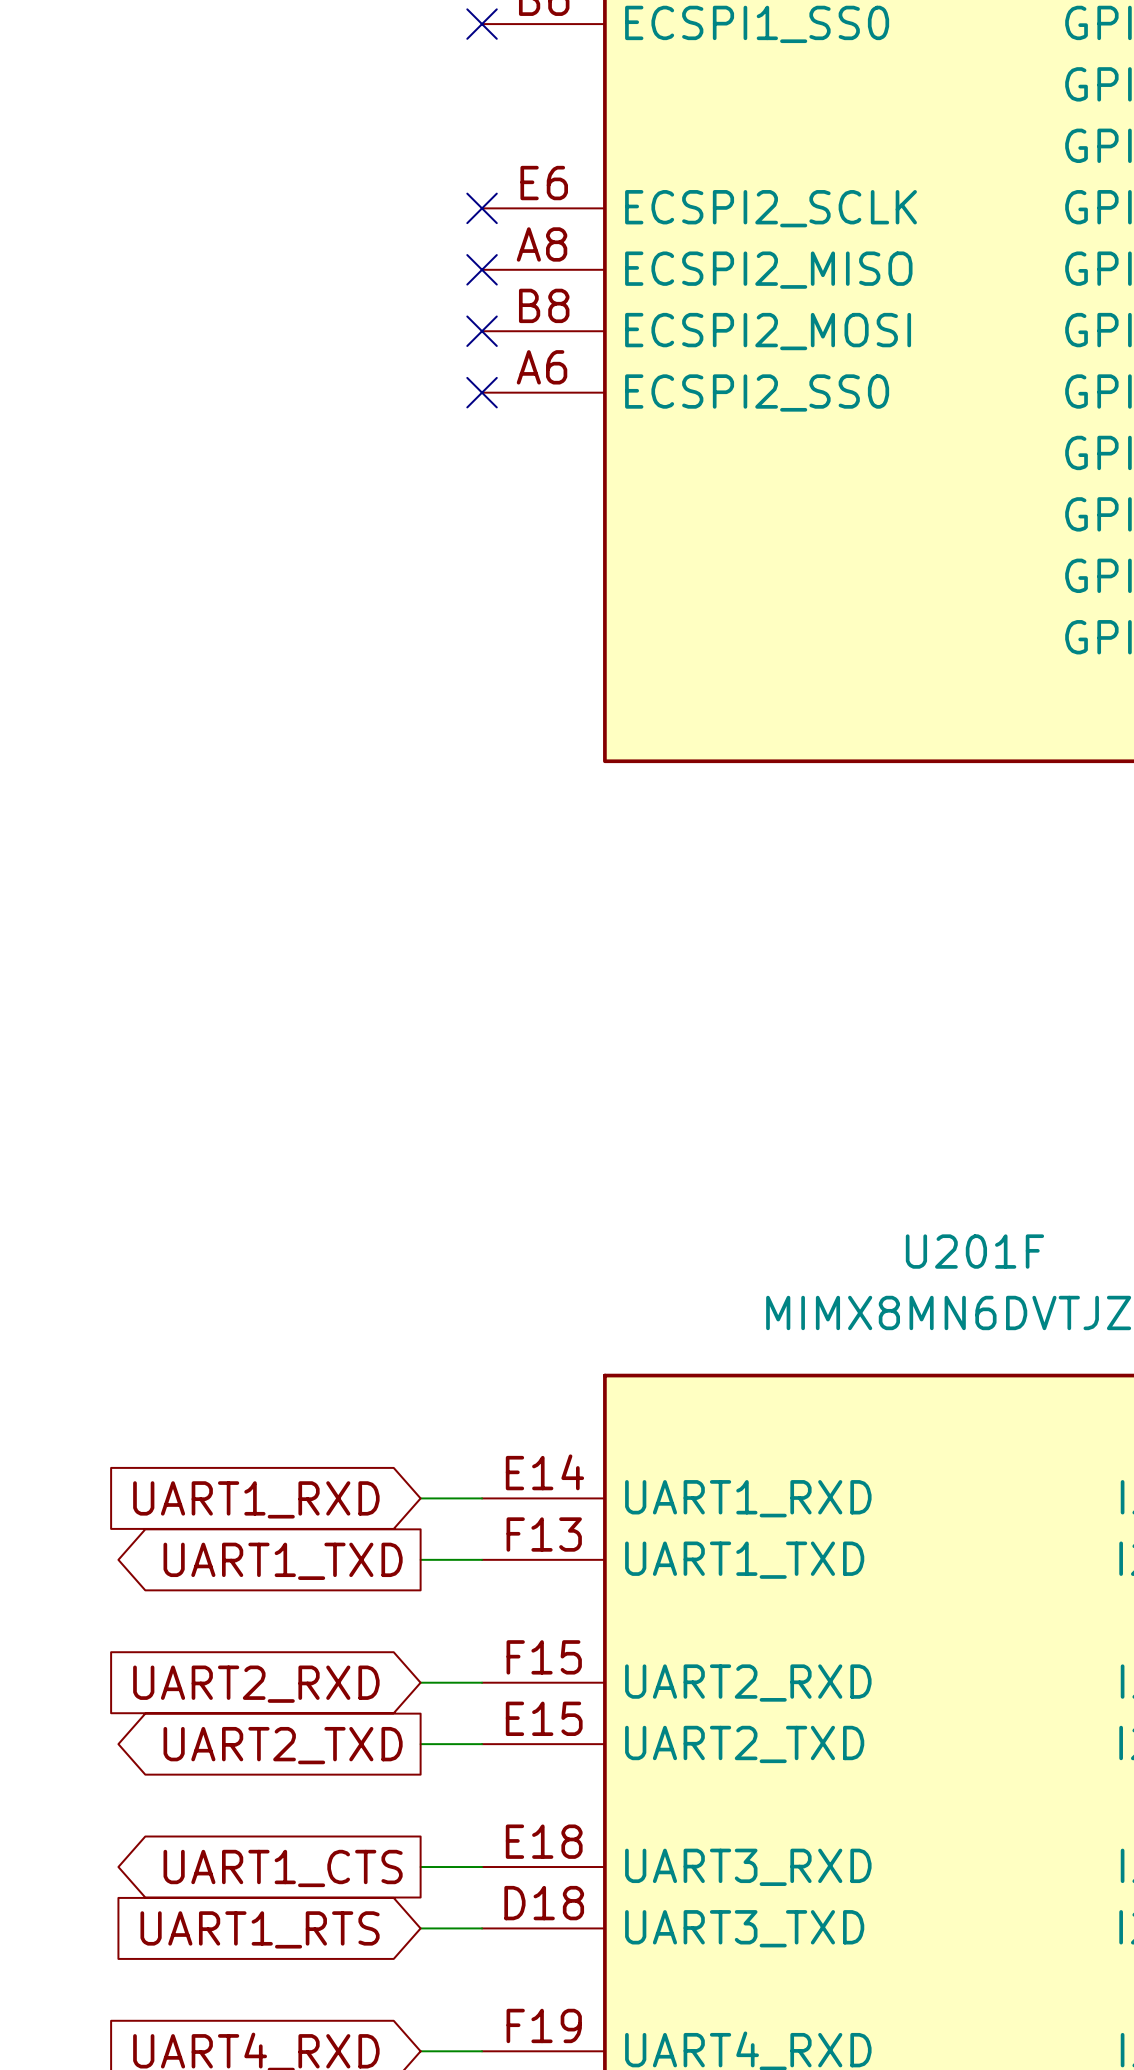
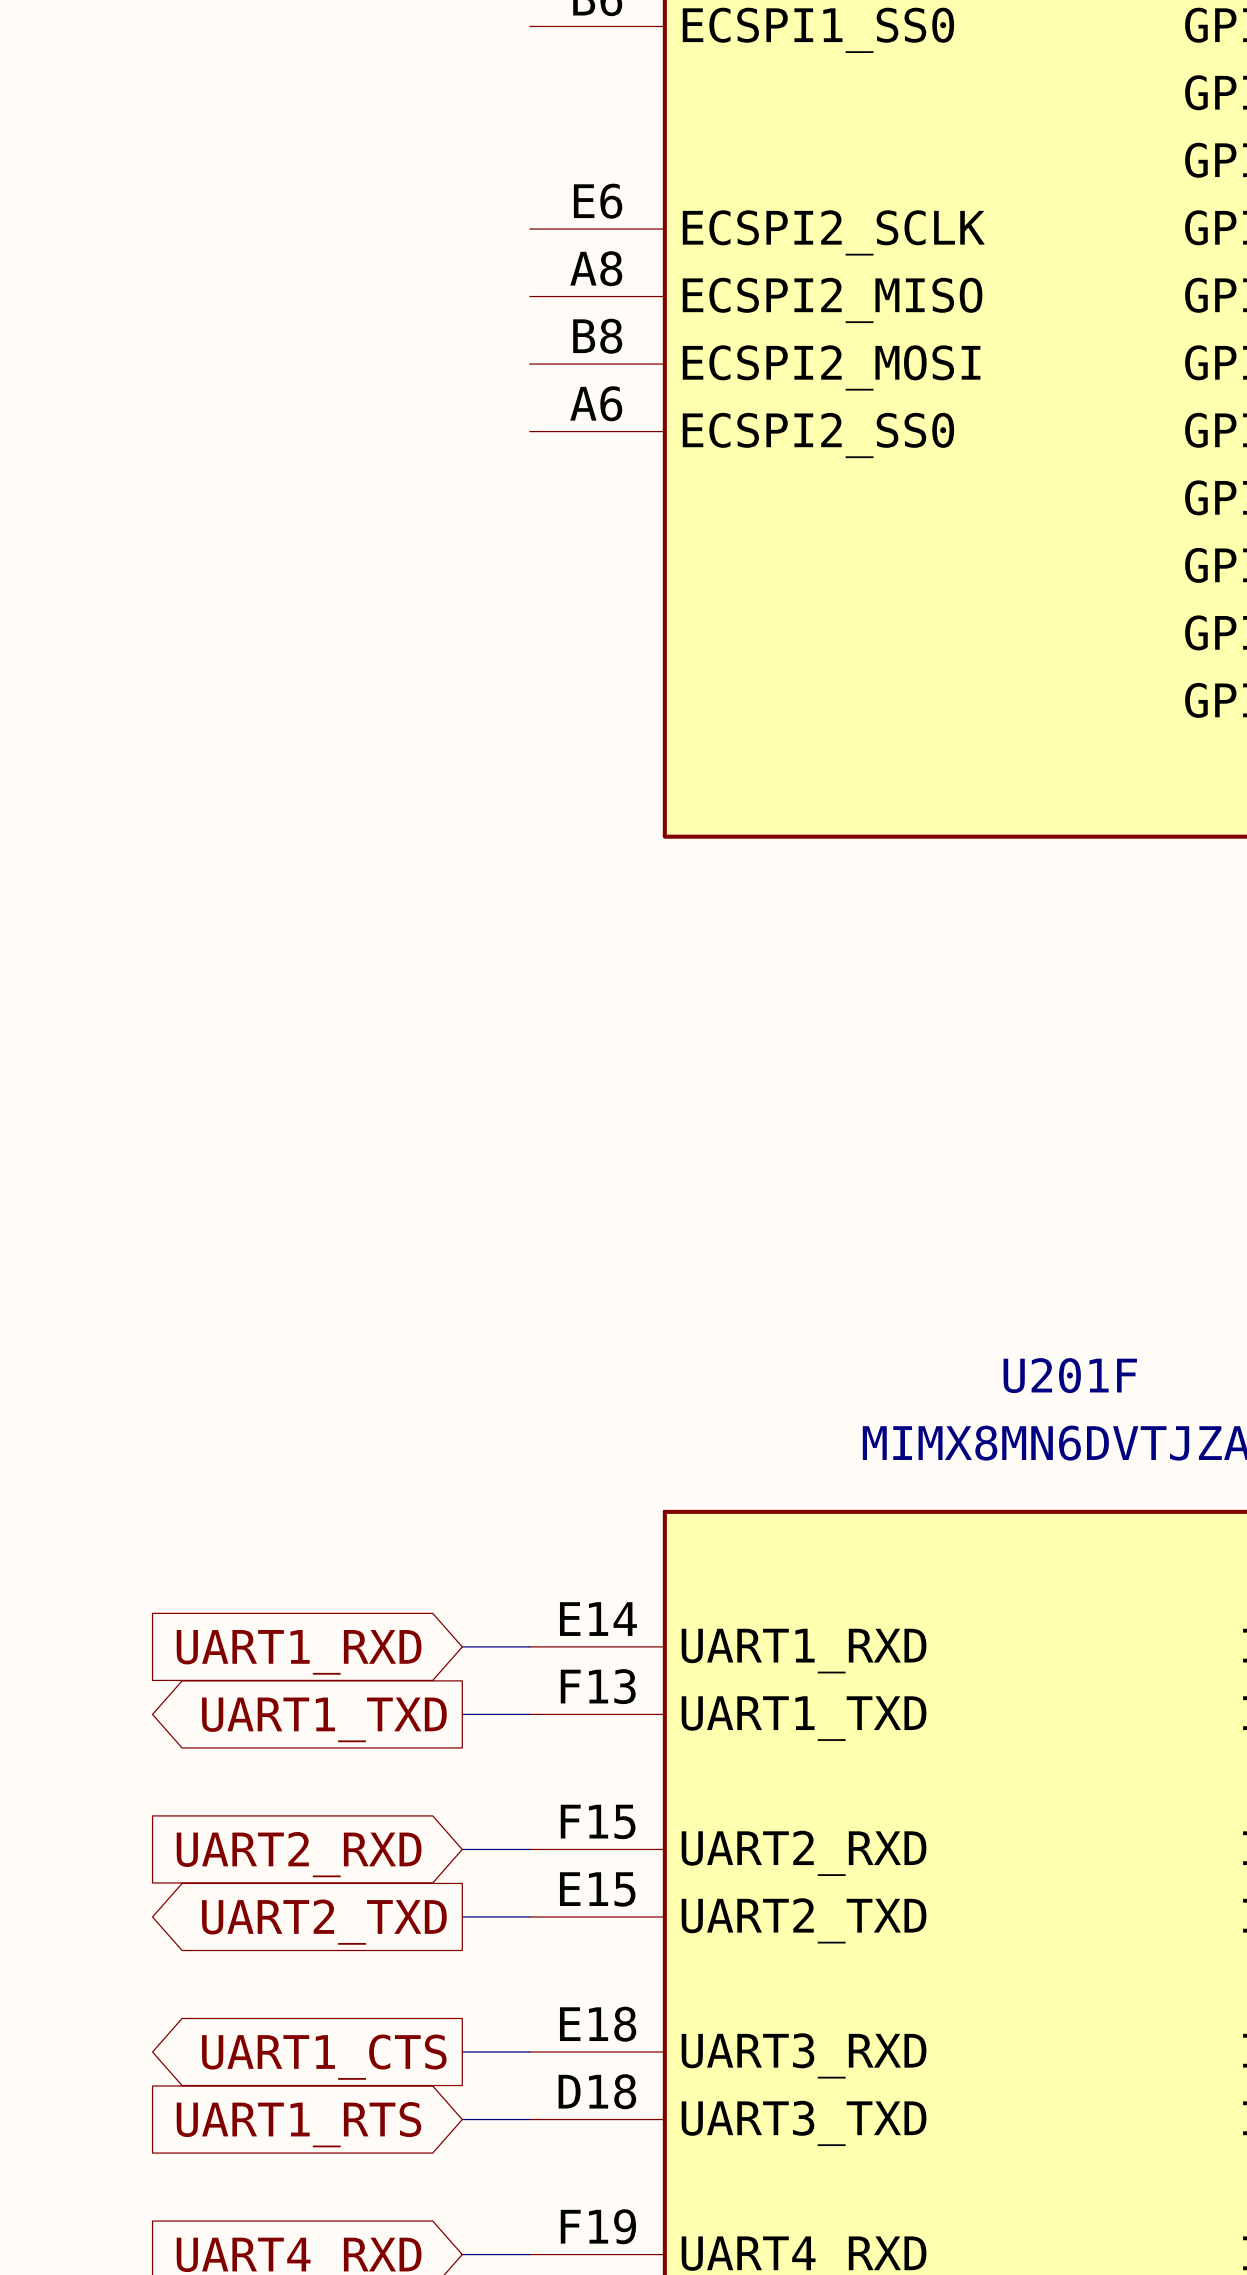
no-connect mark: (482, 24) -> none
no-connect mark: (482, 208) -> none
no-connect mark: (482, 269) -> none
no-connect mark: (482, 331) -> none
no-connect mark: (482, 392) -> none

